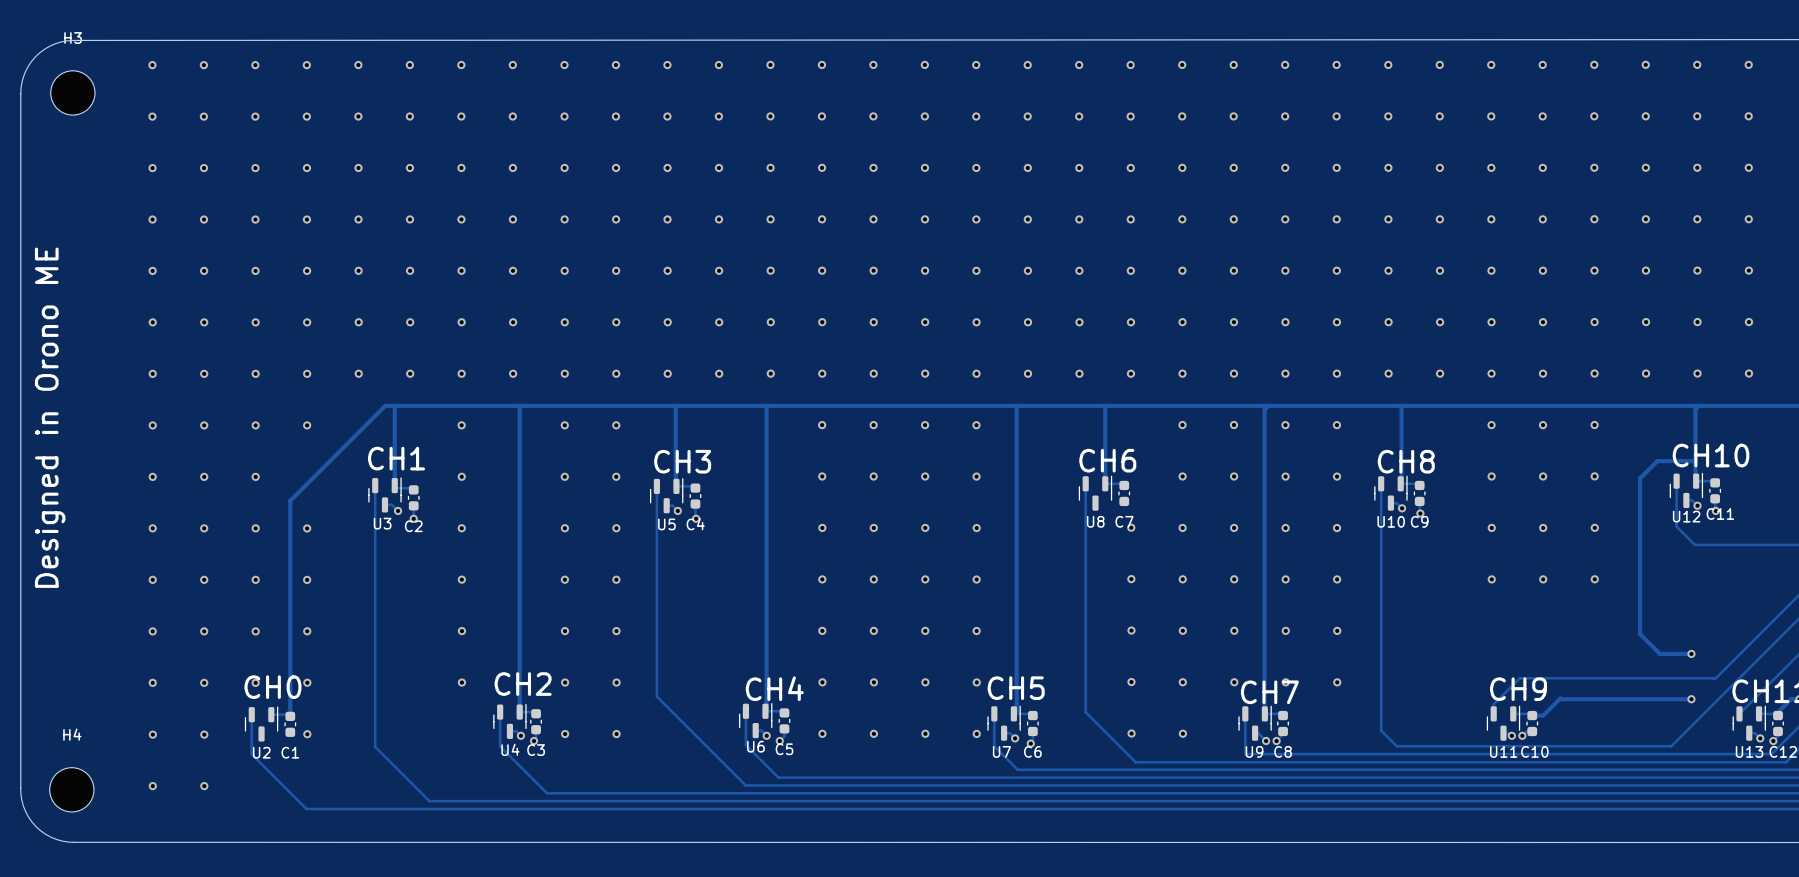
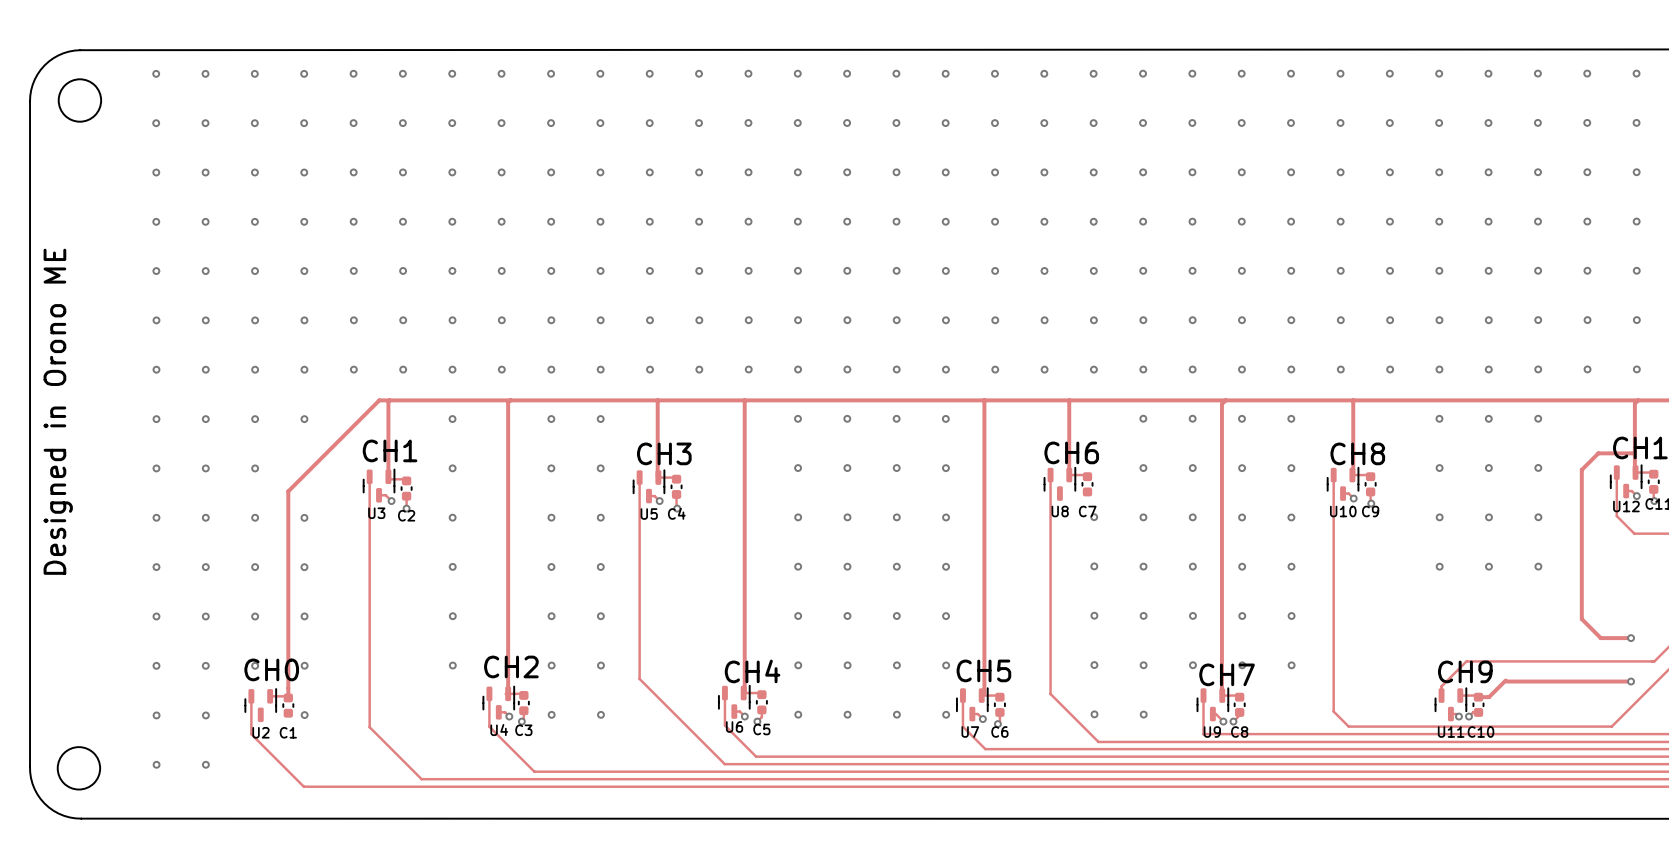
H3 name: H3 (73, 37) -> none
H4 name: H4 (72, 734) -> none

